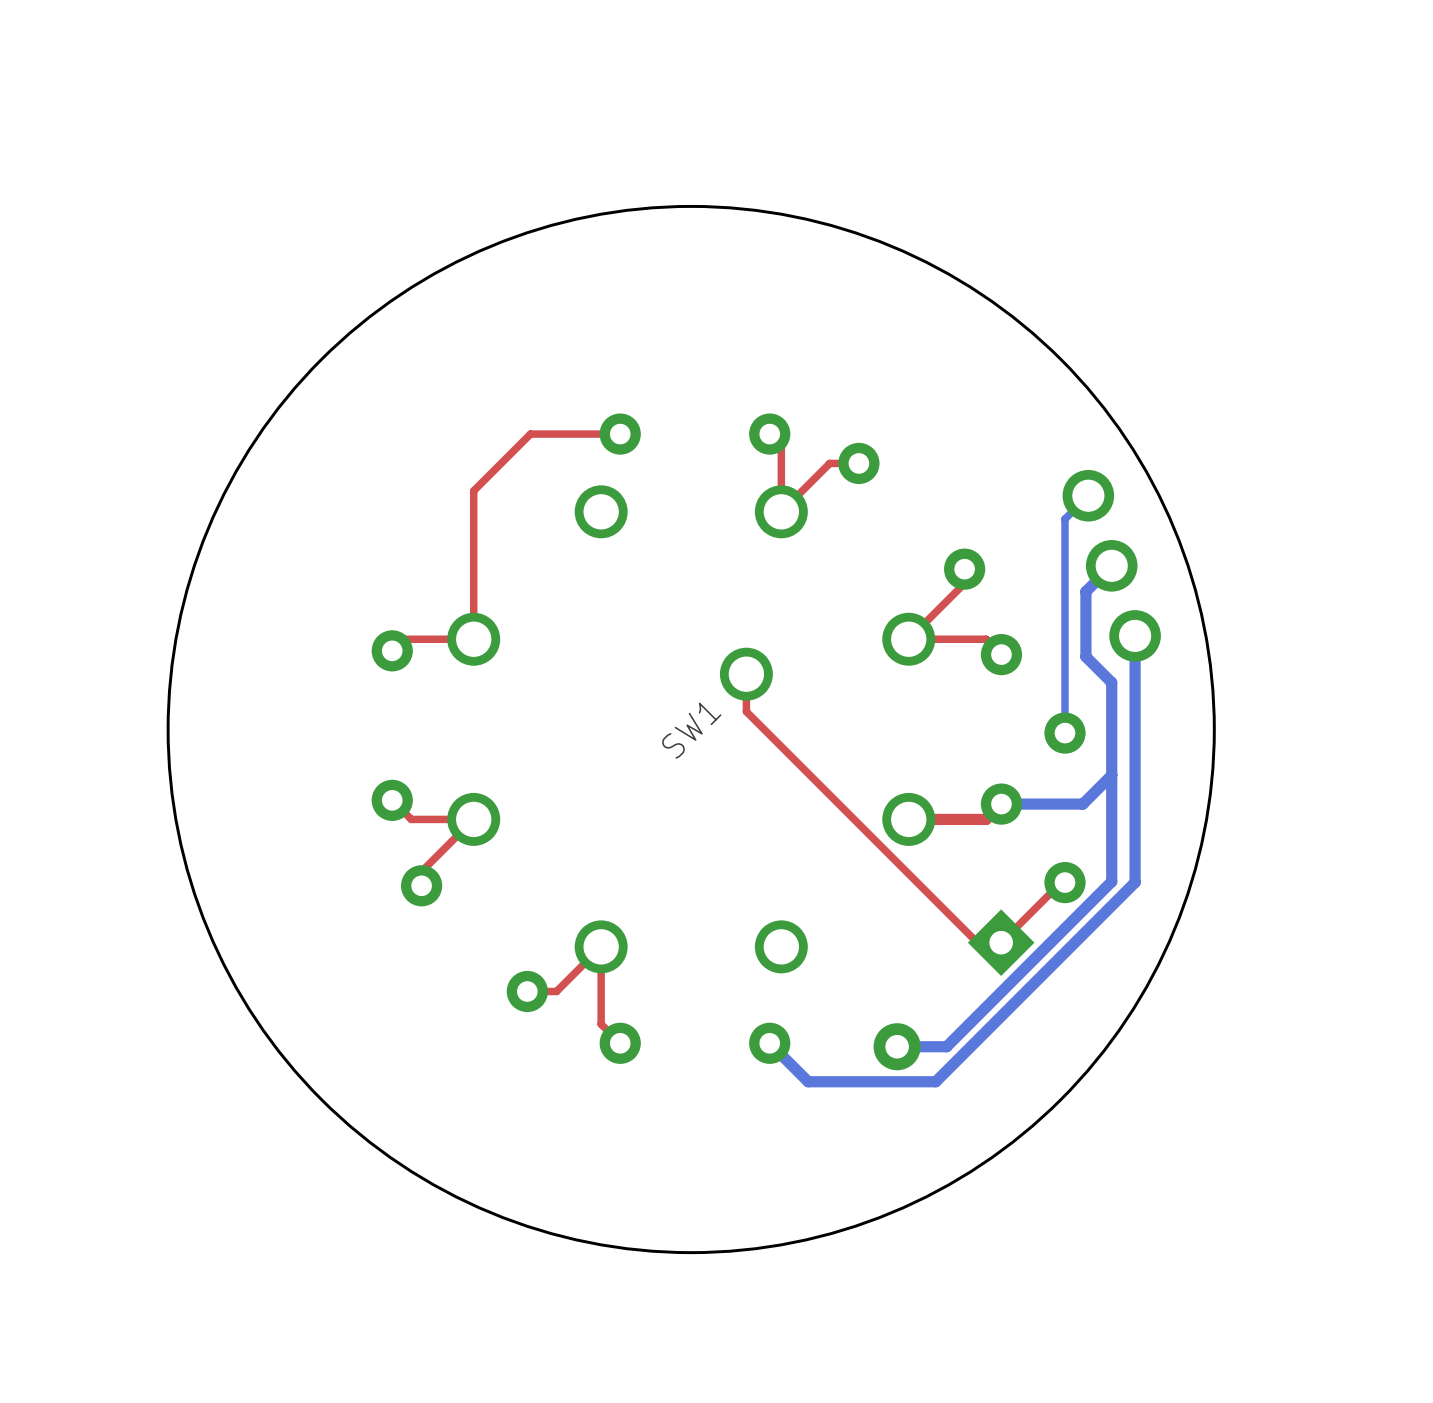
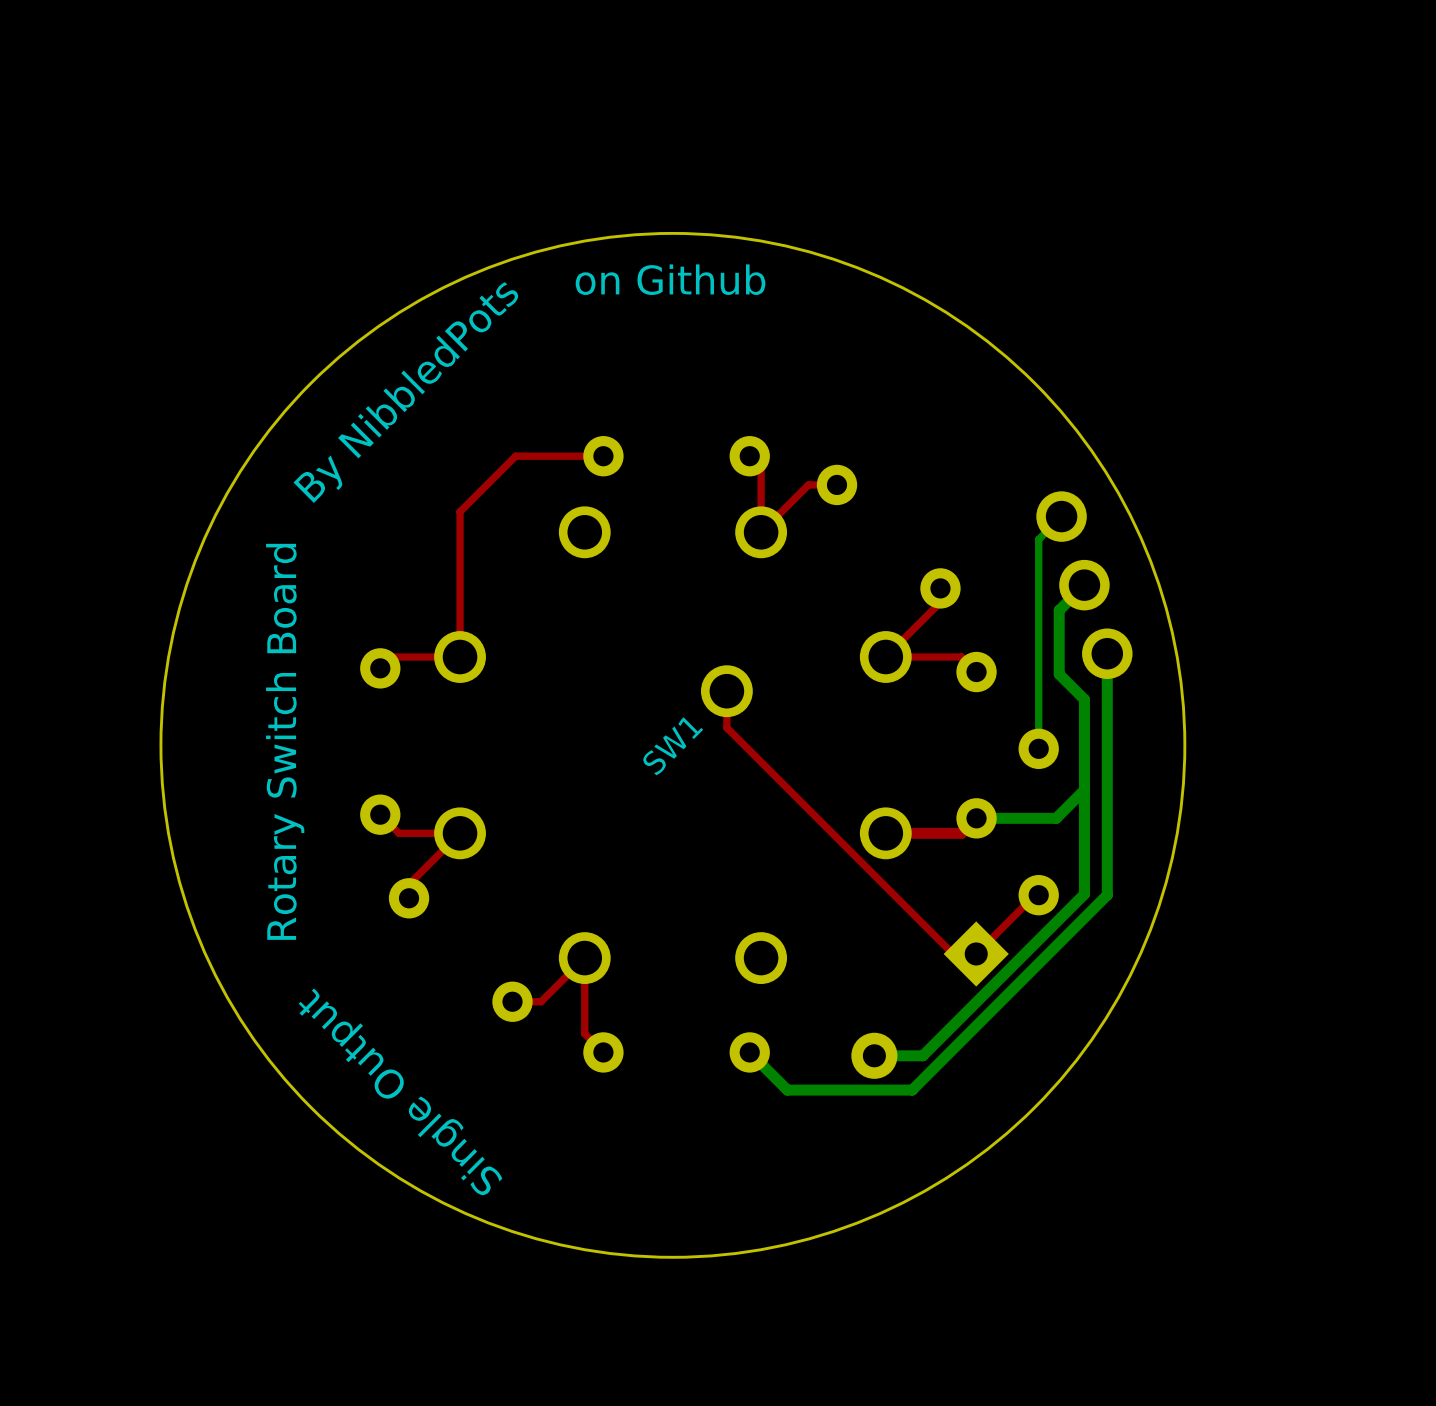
text: none -> on Github (670, 279)
text: none -> By NibbledPots (406, 392)
text: none -> Rotary Switch Board (285, 741)
text: none -> Single Output (400, 1091)

